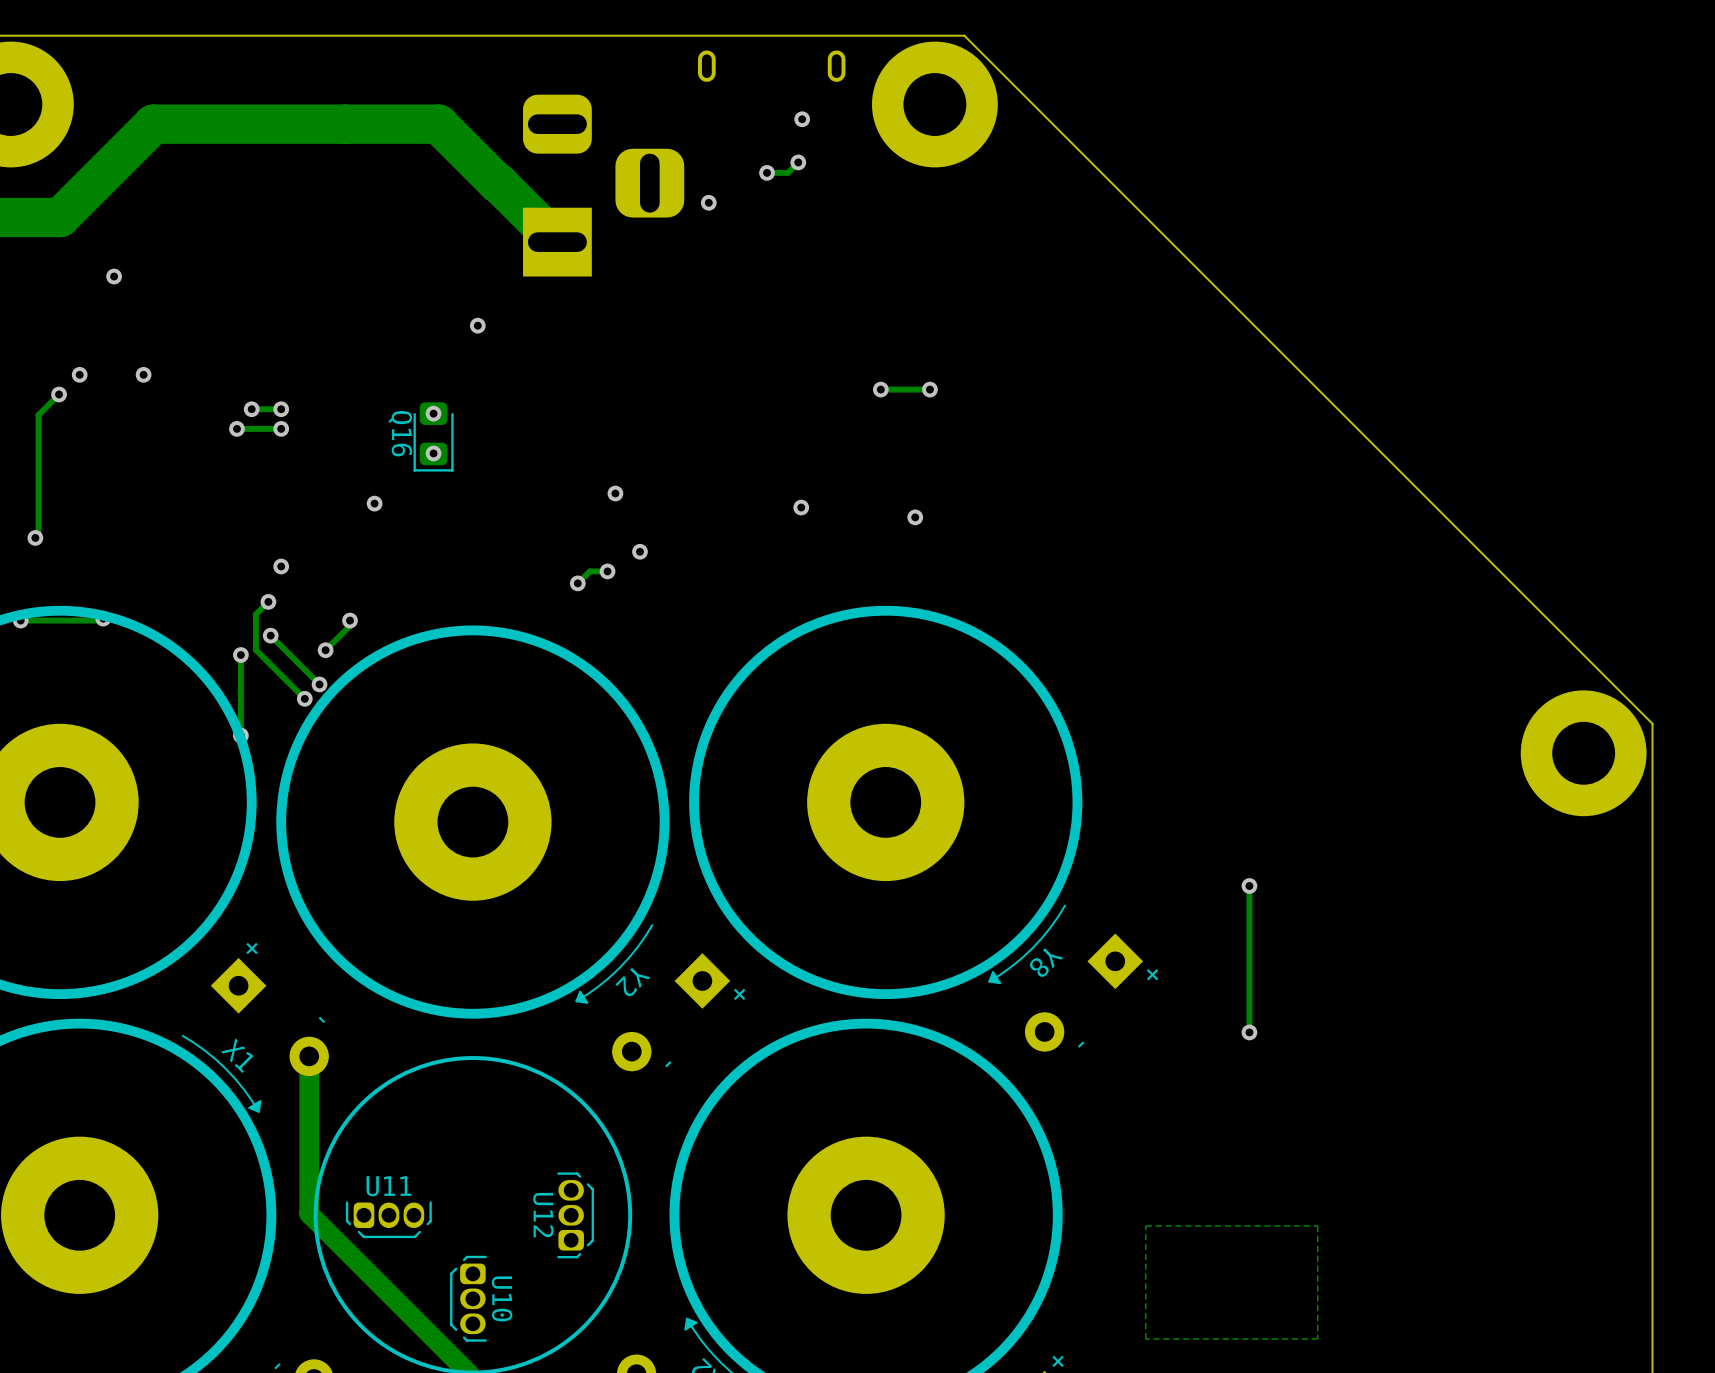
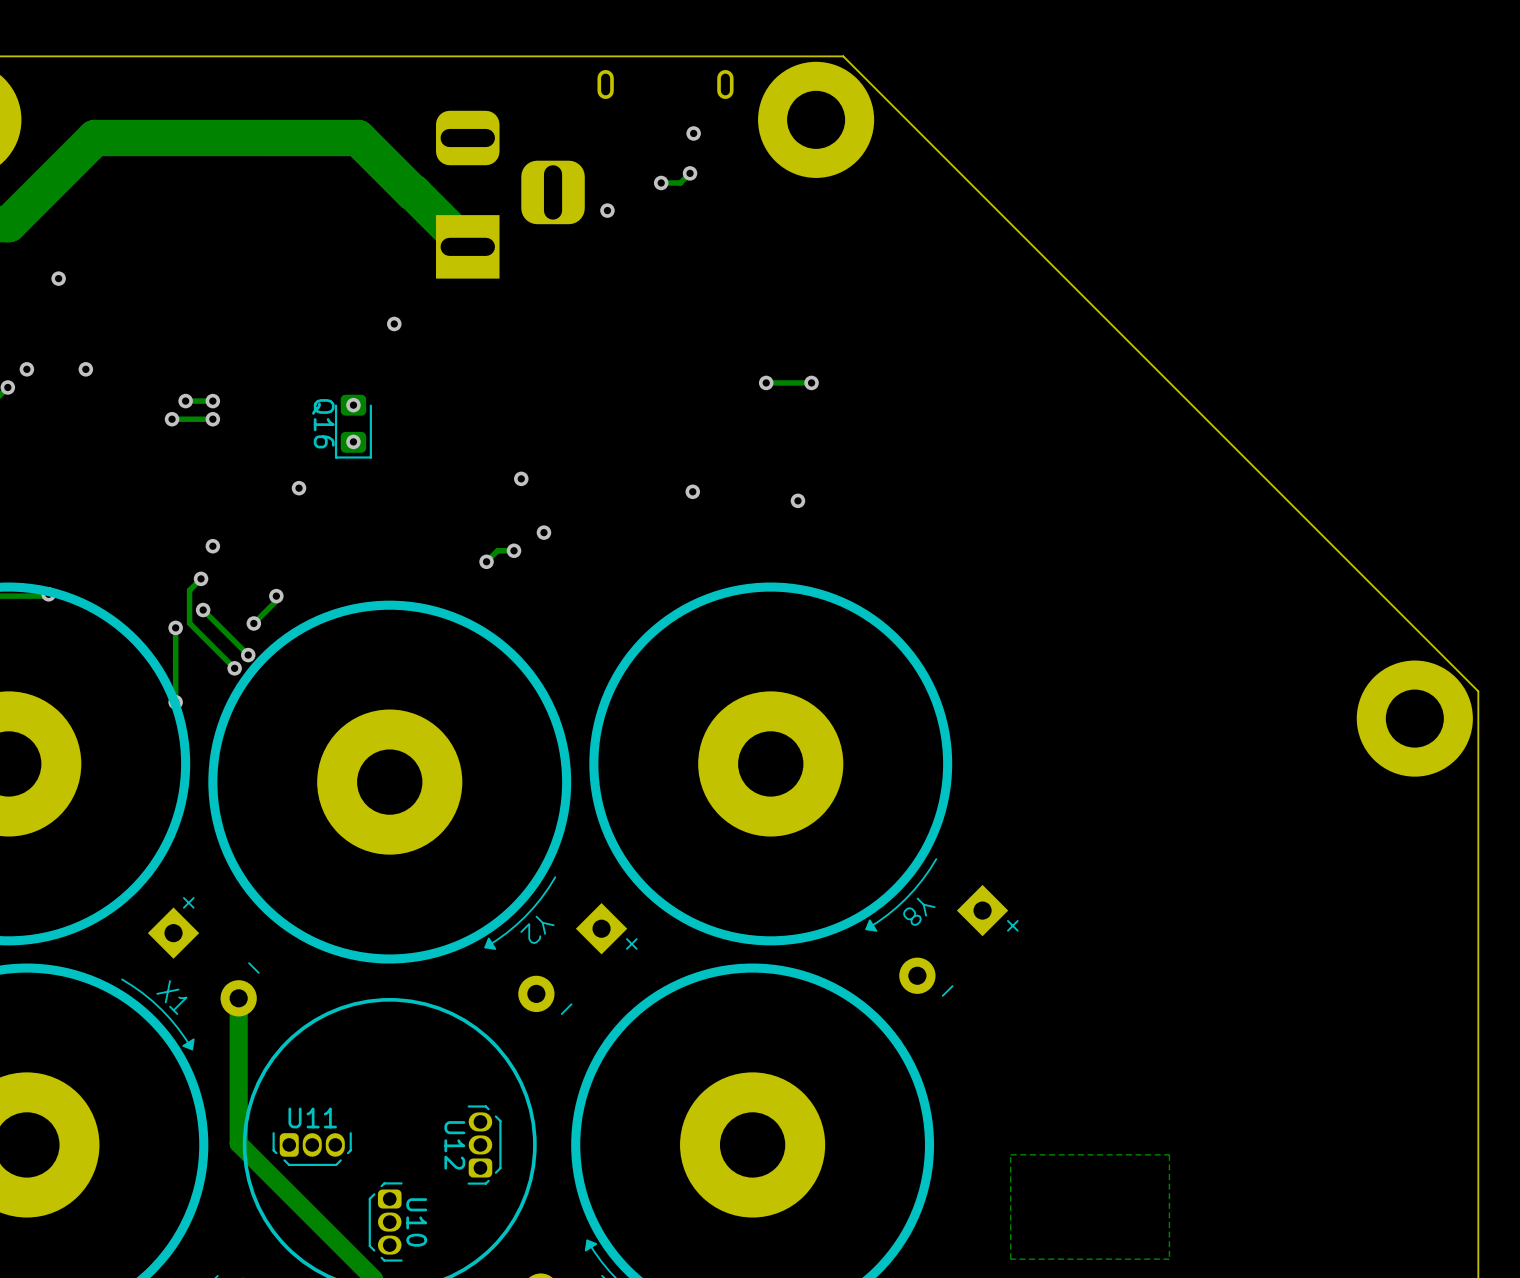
track: (1249, 885) (1249, 1032) -> none
via: (1249, 885) -> none
via: (1249, 1032) -> none

